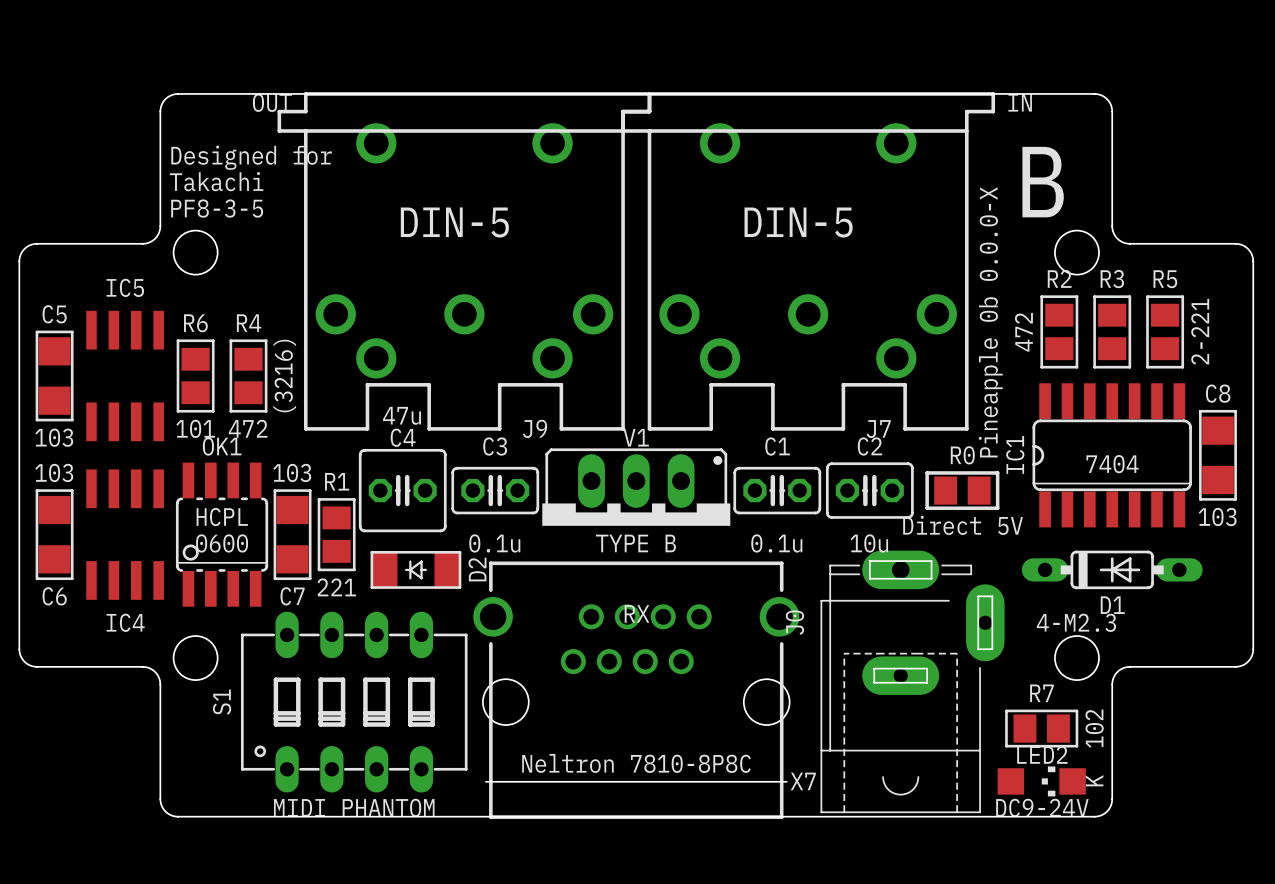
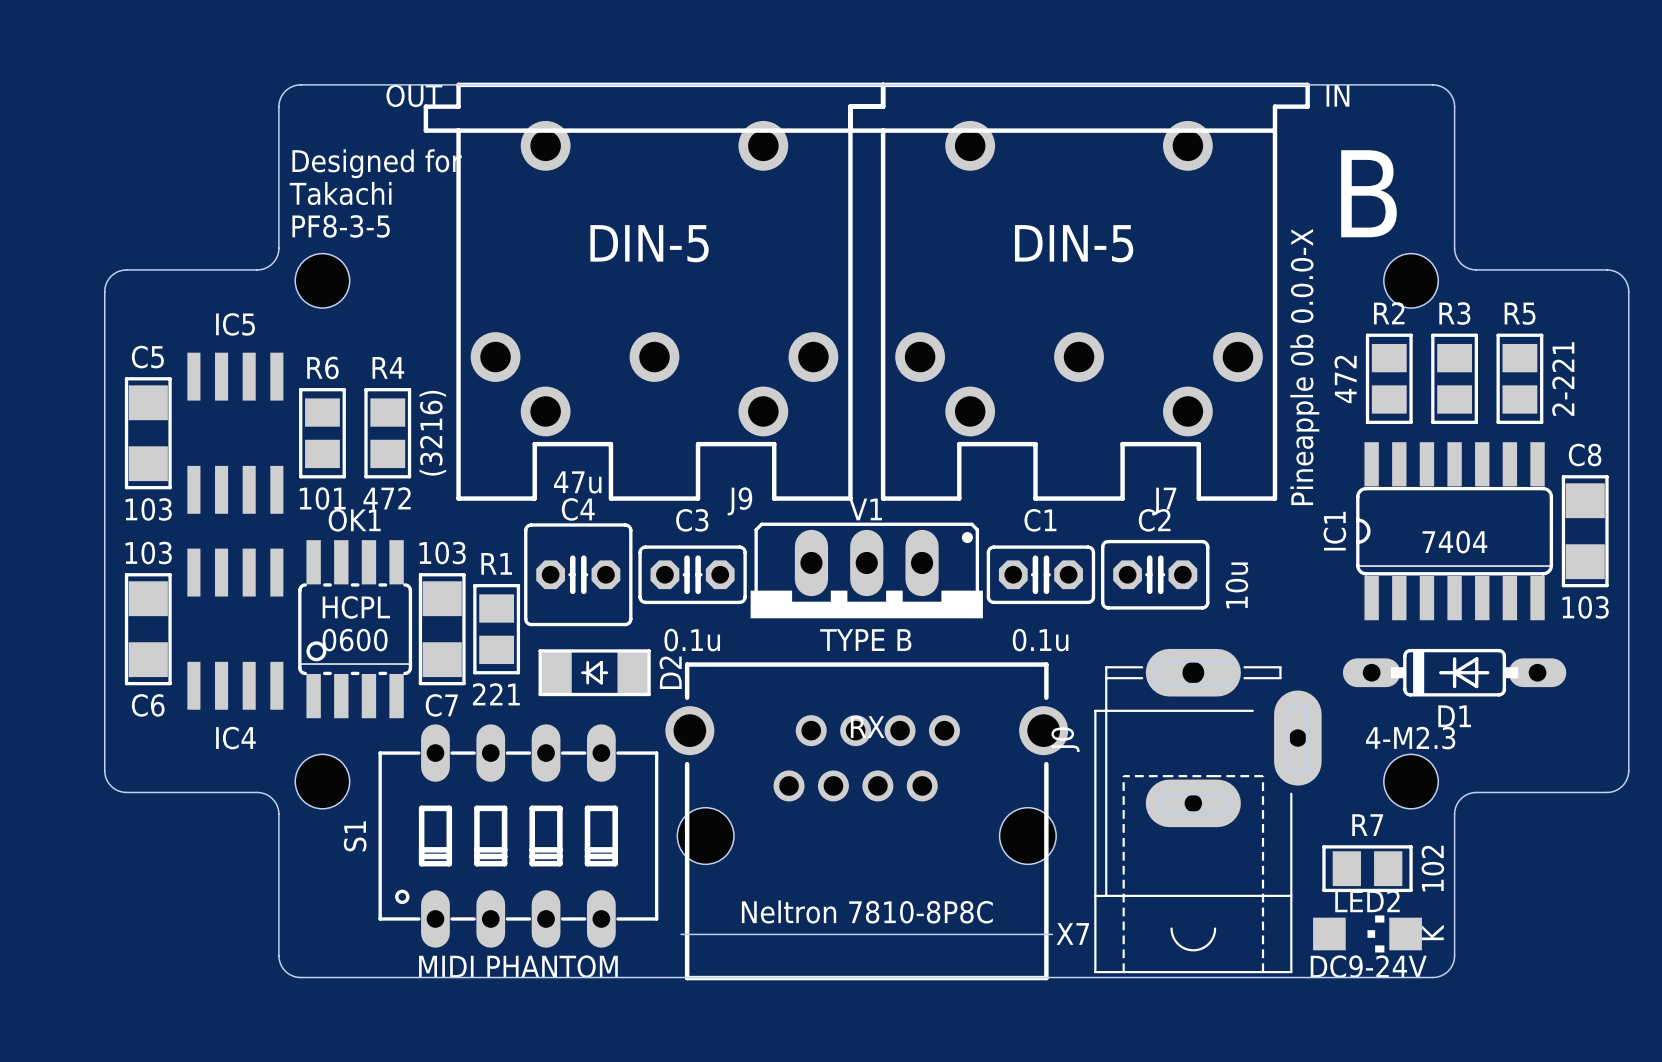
line: (927, 472) (927, 508) (997, 508) (997, 472) (927, 472) -> none
R0: (962, 490) -> none
text: Direct 5V (963, 525) -> none
text rotation: 0° (869, 543) -> 90° counterclockwise (1236, 585)
text position: 10u (869, 543) -> 10u (1236, 585)

